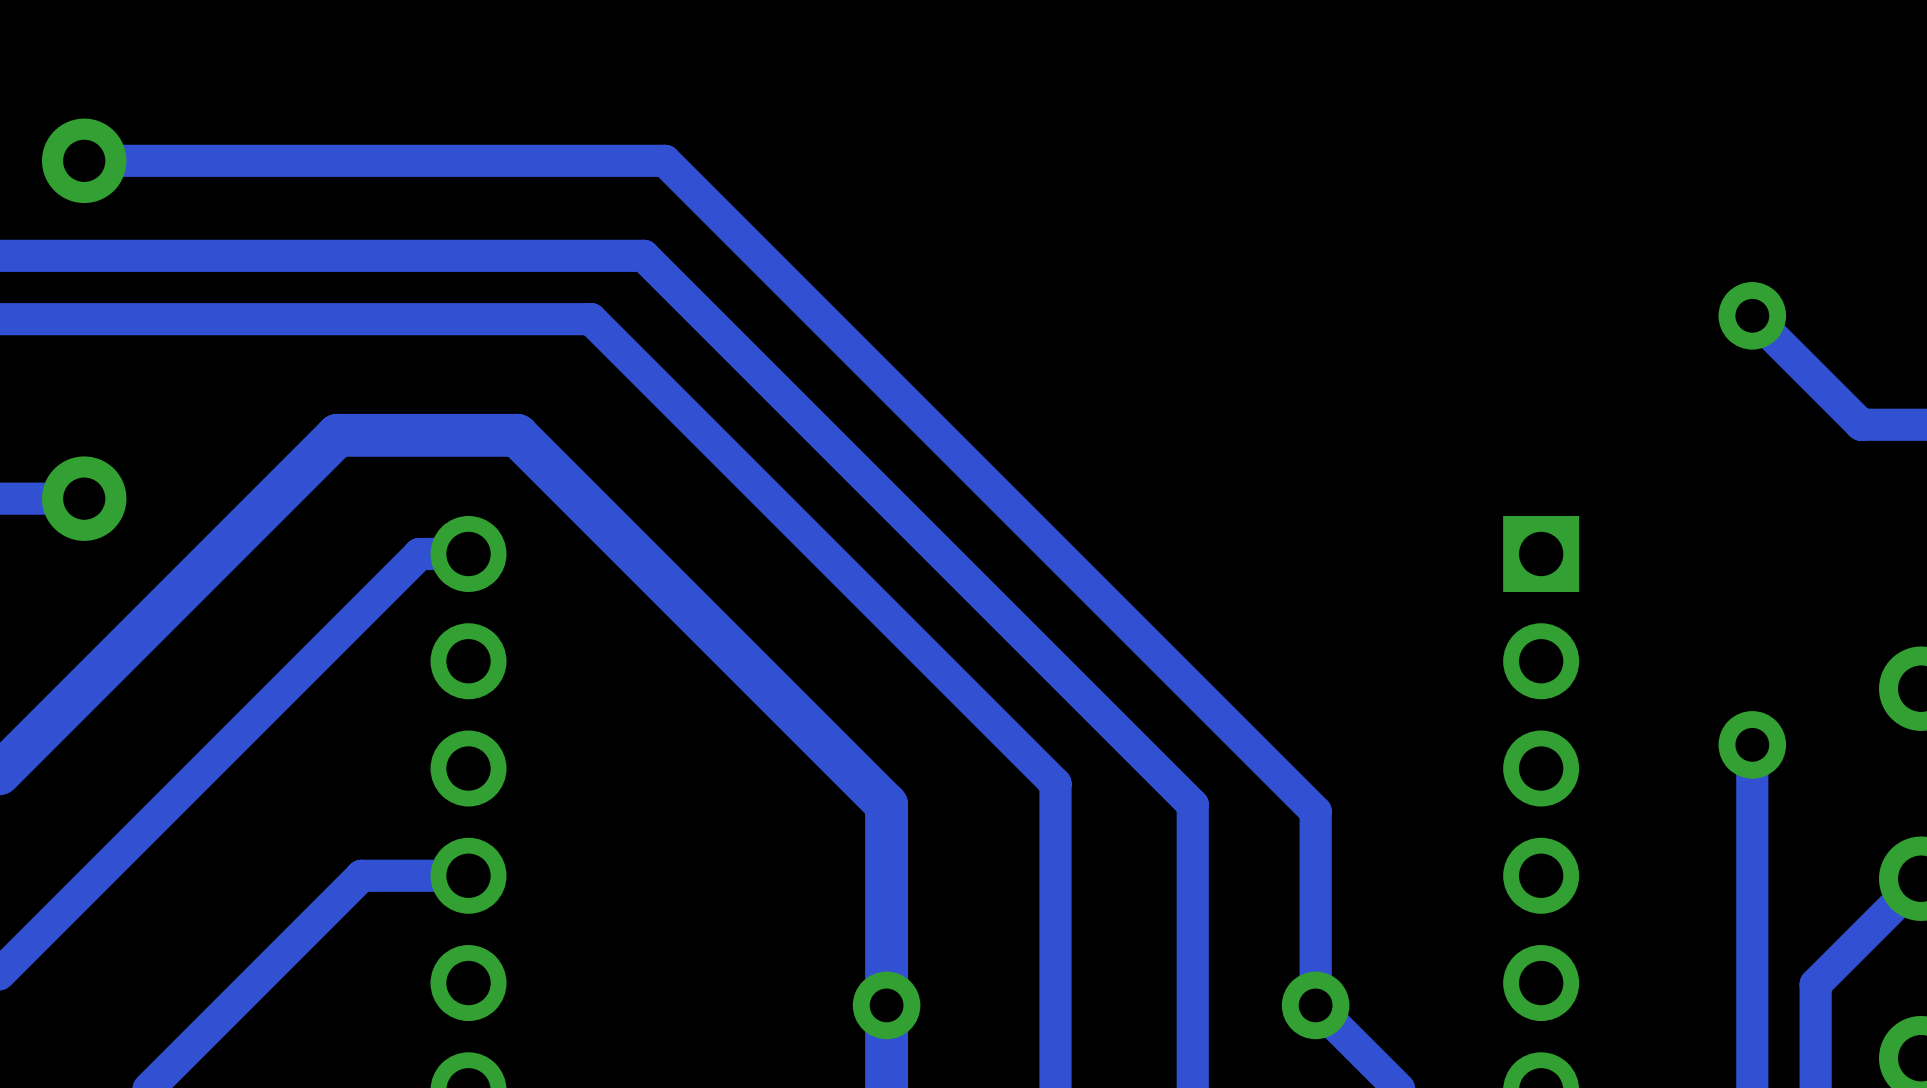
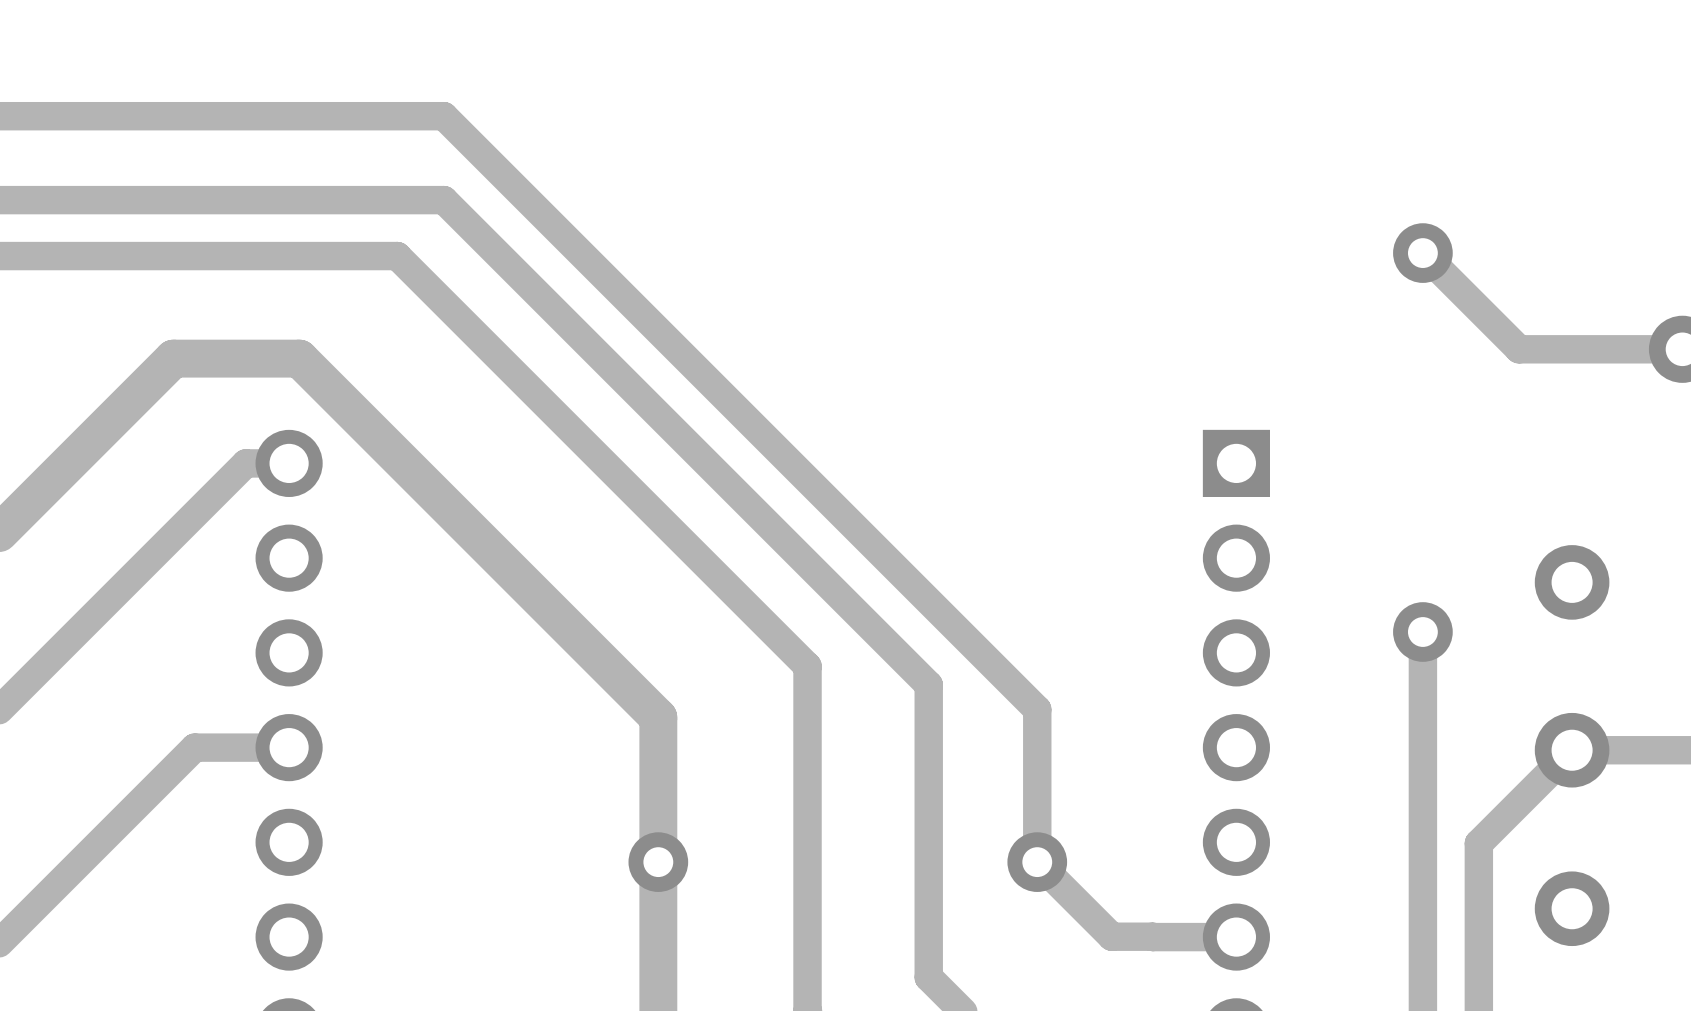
track: (643, 160) (664, 160) (1315, 811) (1315, 832) -> (443, 116) (1037, 709)
track: (480, 435) (517, 435) (886, 804) (886, 841) -> (299, 358) (658, 717)

